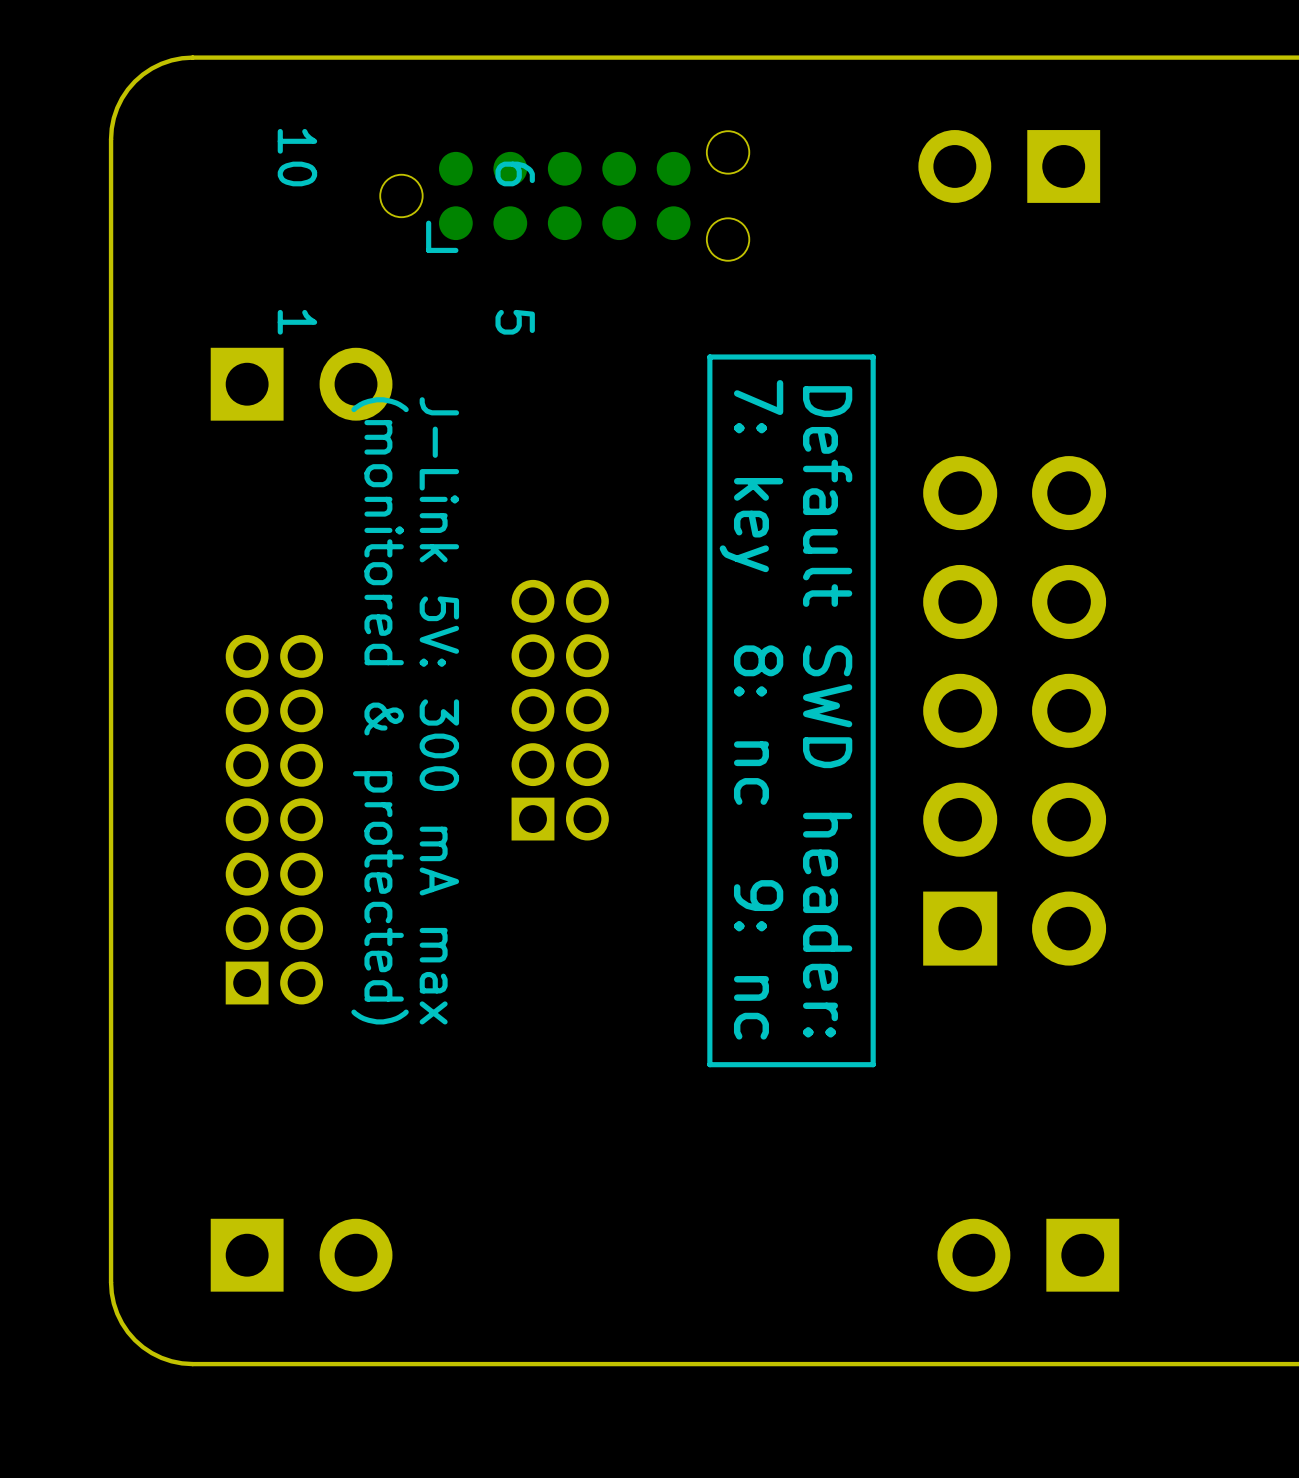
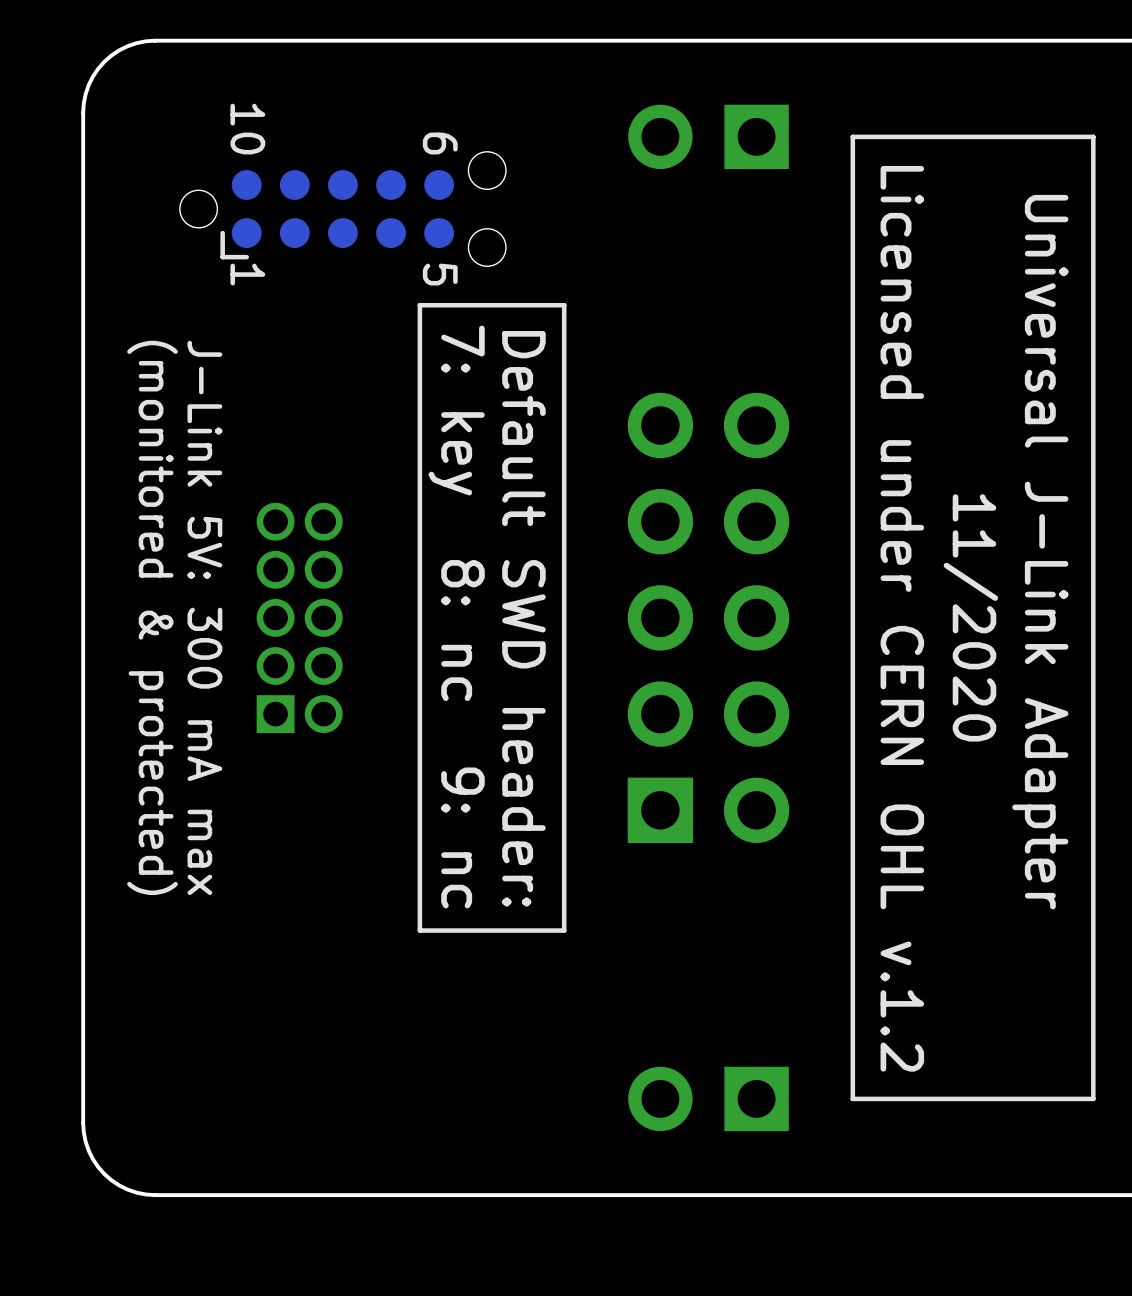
part position: (1009, 166) -> (708, 136)
line: none -> (1093, 136) (1093, 1098) (852, 1098) (852, 136) (1093, 136)
part position: (564, 195) -> (342, 209)
line: (873, 357) (873, 1064) (709, 1064) (709, 357) (873, 357) -> (564, 305) (564, 930) (419, 930) (419, 305) (564, 305)
part: (301, 384) -> none
text: none -> Universal J-Link Adapter (1040, 552)
text position: 7: key 8: nc 9: nc (751, 709) -> 7: key 8: nc 9: nc (456, 617)
text position: (monitored & protected) (380, 710) -> (monitored & protected) (152, 617)
text position: J-Link 5V: 300 mA max (439, 710) -> J-Link 5V: 300 mA max (204, 617)
part position: (560, 710) -> (299, 617)
part position: (1014, 710) -> (708, 617)
text: none -> 11/2020 (970, 617)
text position: Default SWD header: (827, 711) -> Default SWD header: (523, 618)
text: none -> Licensed under CERN OHL v.1.2 (902, 618)
part: (274, 819) -> none
part: (301, 1255) -> none
part position: (1028, 1255) -> (708, 1098)

